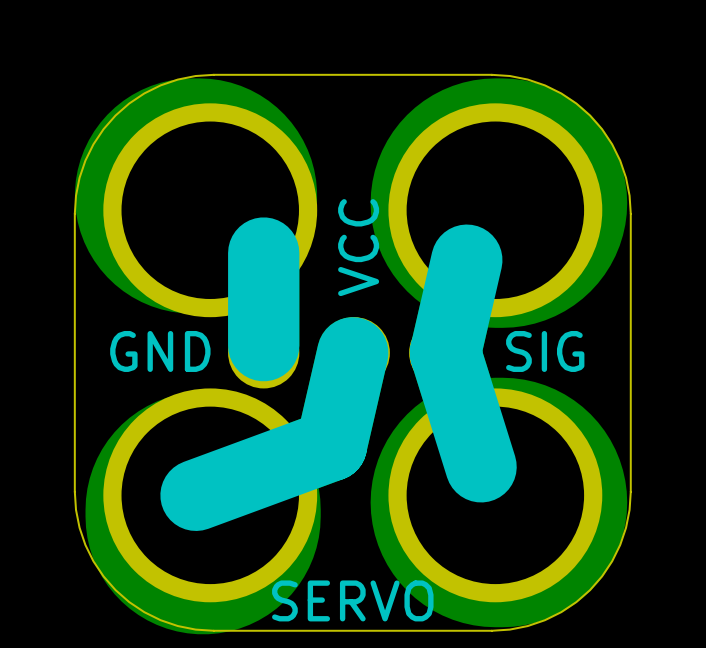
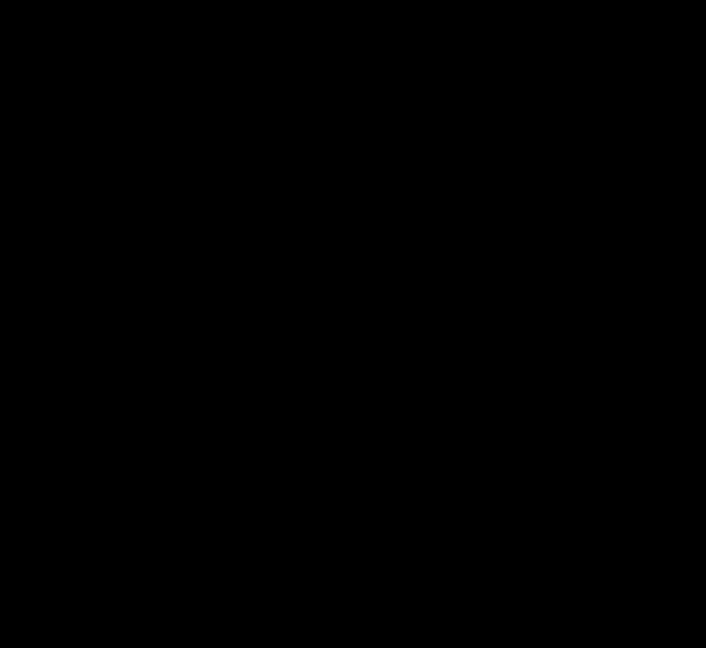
part: (352, 354) -> none

